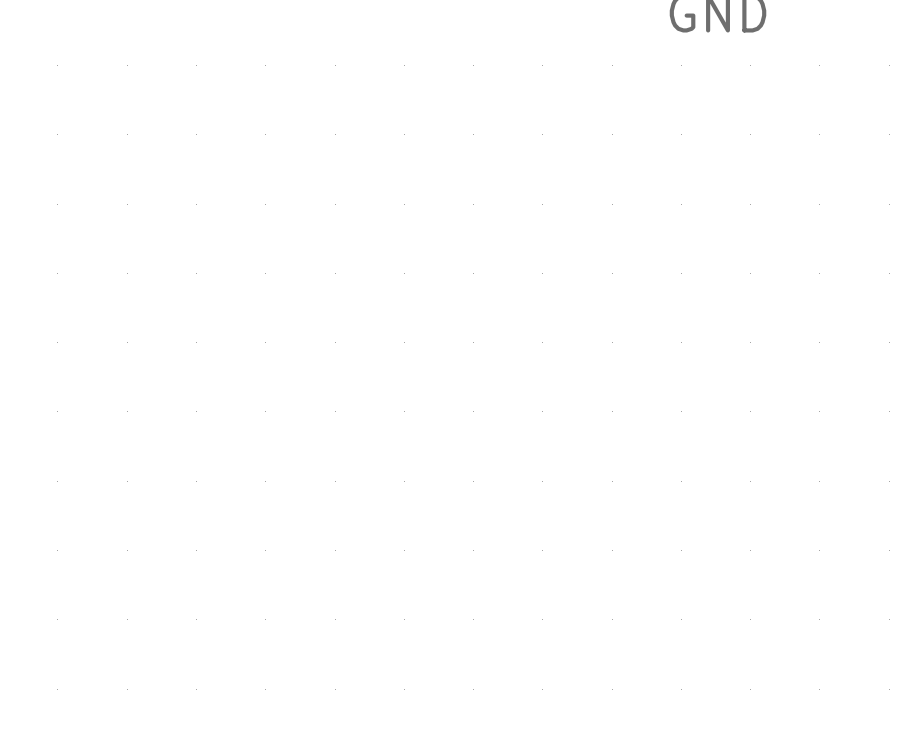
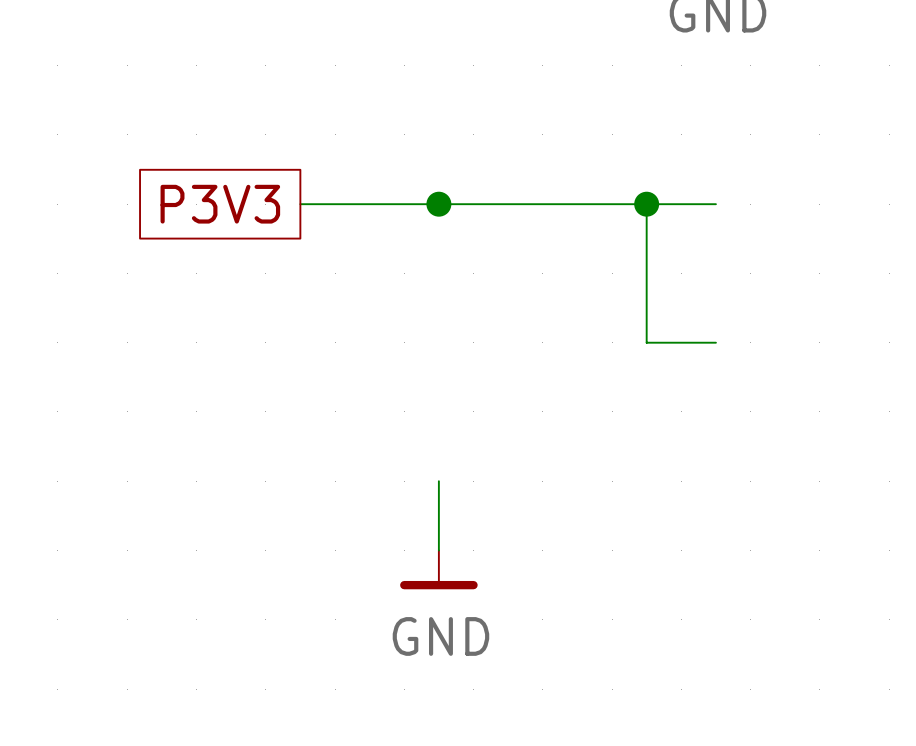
global label: none -> P3V3 (220, 204)
wire: none -> (300, 204) (715, 204)
junction: none -> (438, 204)
wire: none -> (646, 204) (646, 342) (715, 342)
junction: none -> (646, 204)
wire: none -> (438, 481) (438, 550)
power symbol: none -> GND (438, 569)

